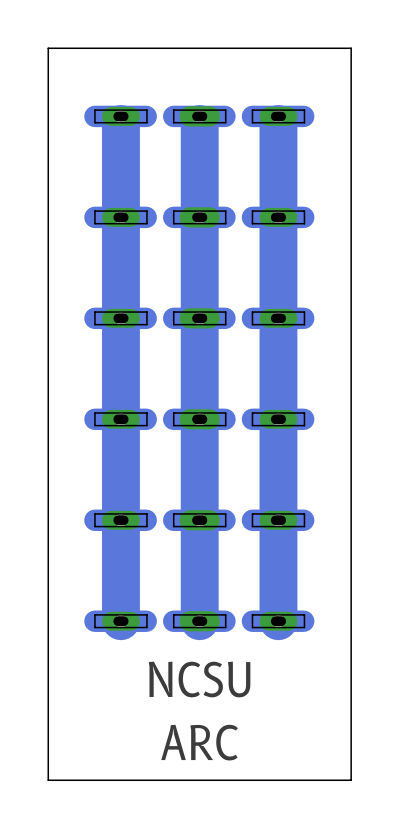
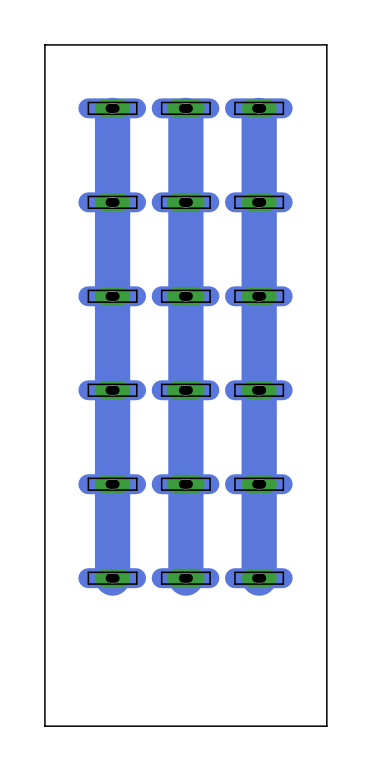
text: NCSU (199, 679) -> none
text: ARC (199, 742) -> none

